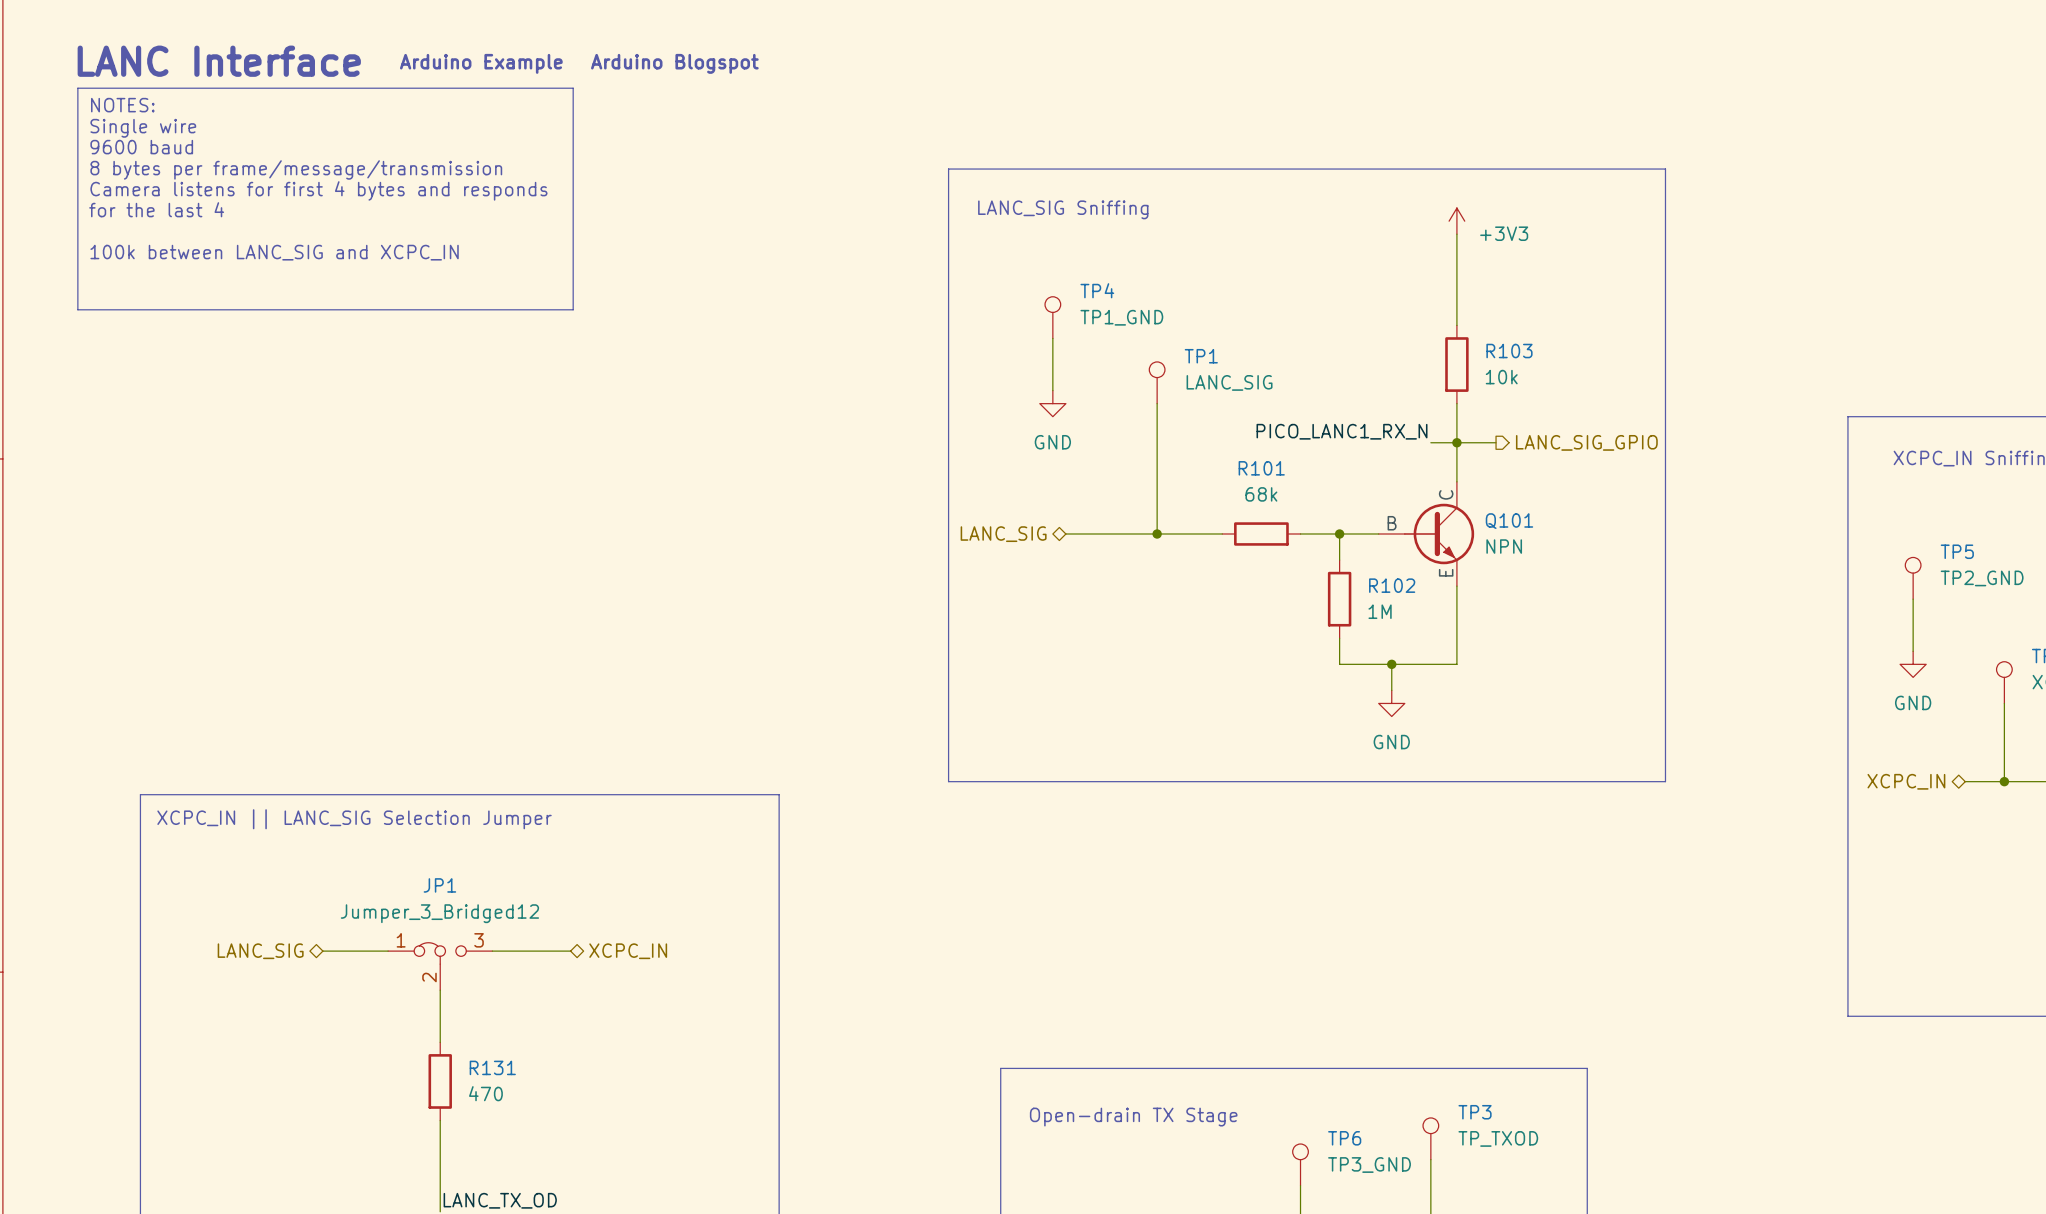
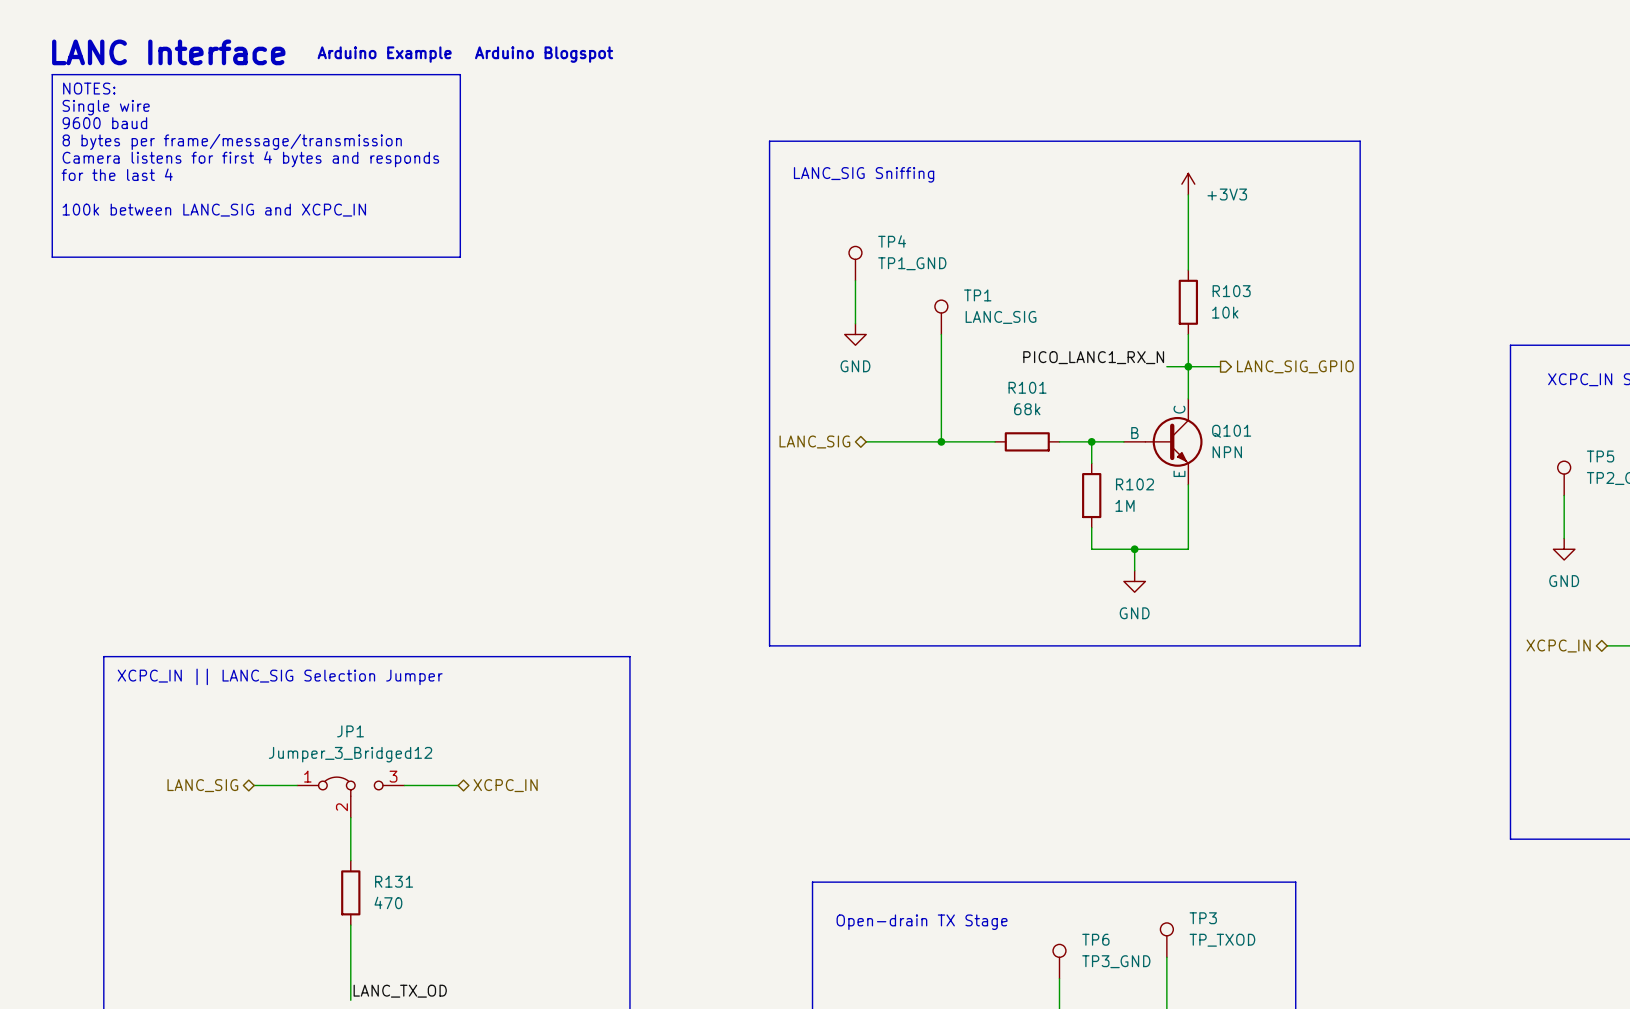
JP1 symbol: [388, 942, 493, 991] -> [297, 777, 405, 818]

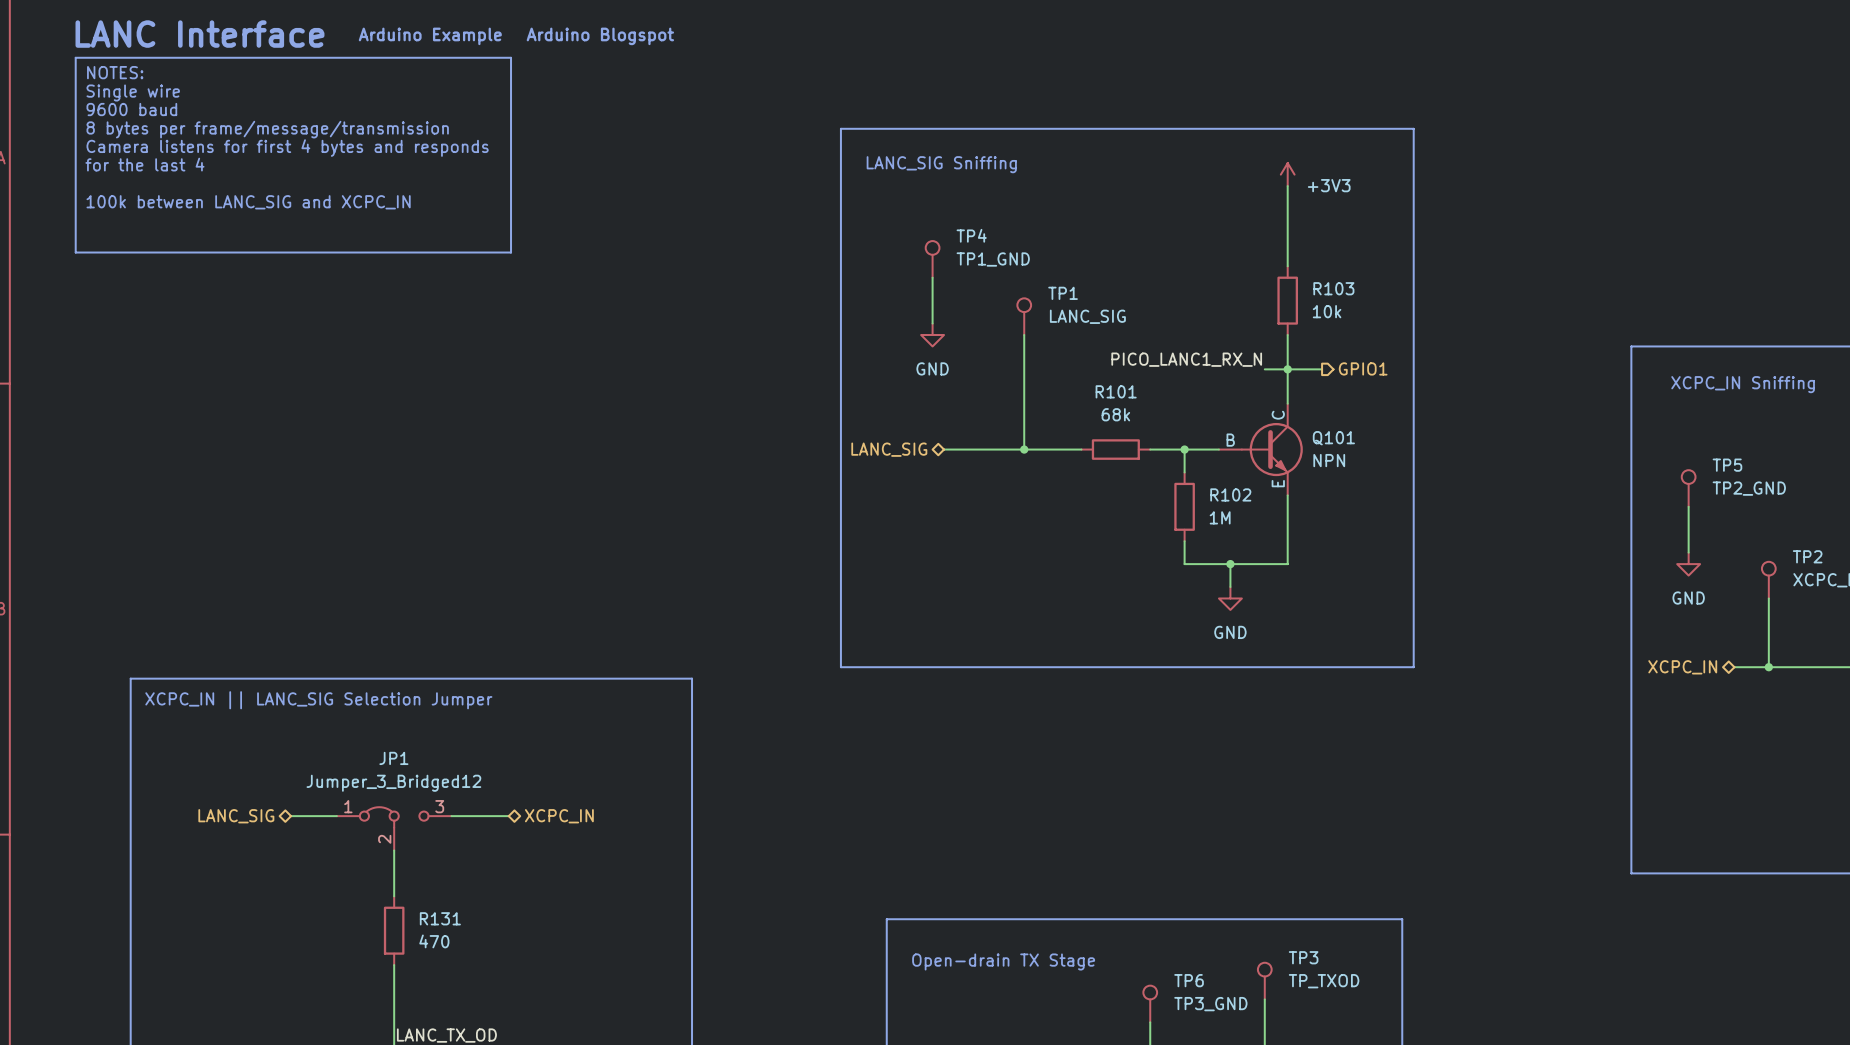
line: (1306, 141) (1360, 141) (1360, 645) (1306, 645) -> (1413, 128) (1413, 667)
hierarchical label: LANC_SIG_GPIO (1295, 366) -> GPIO1 (1363, 368)

